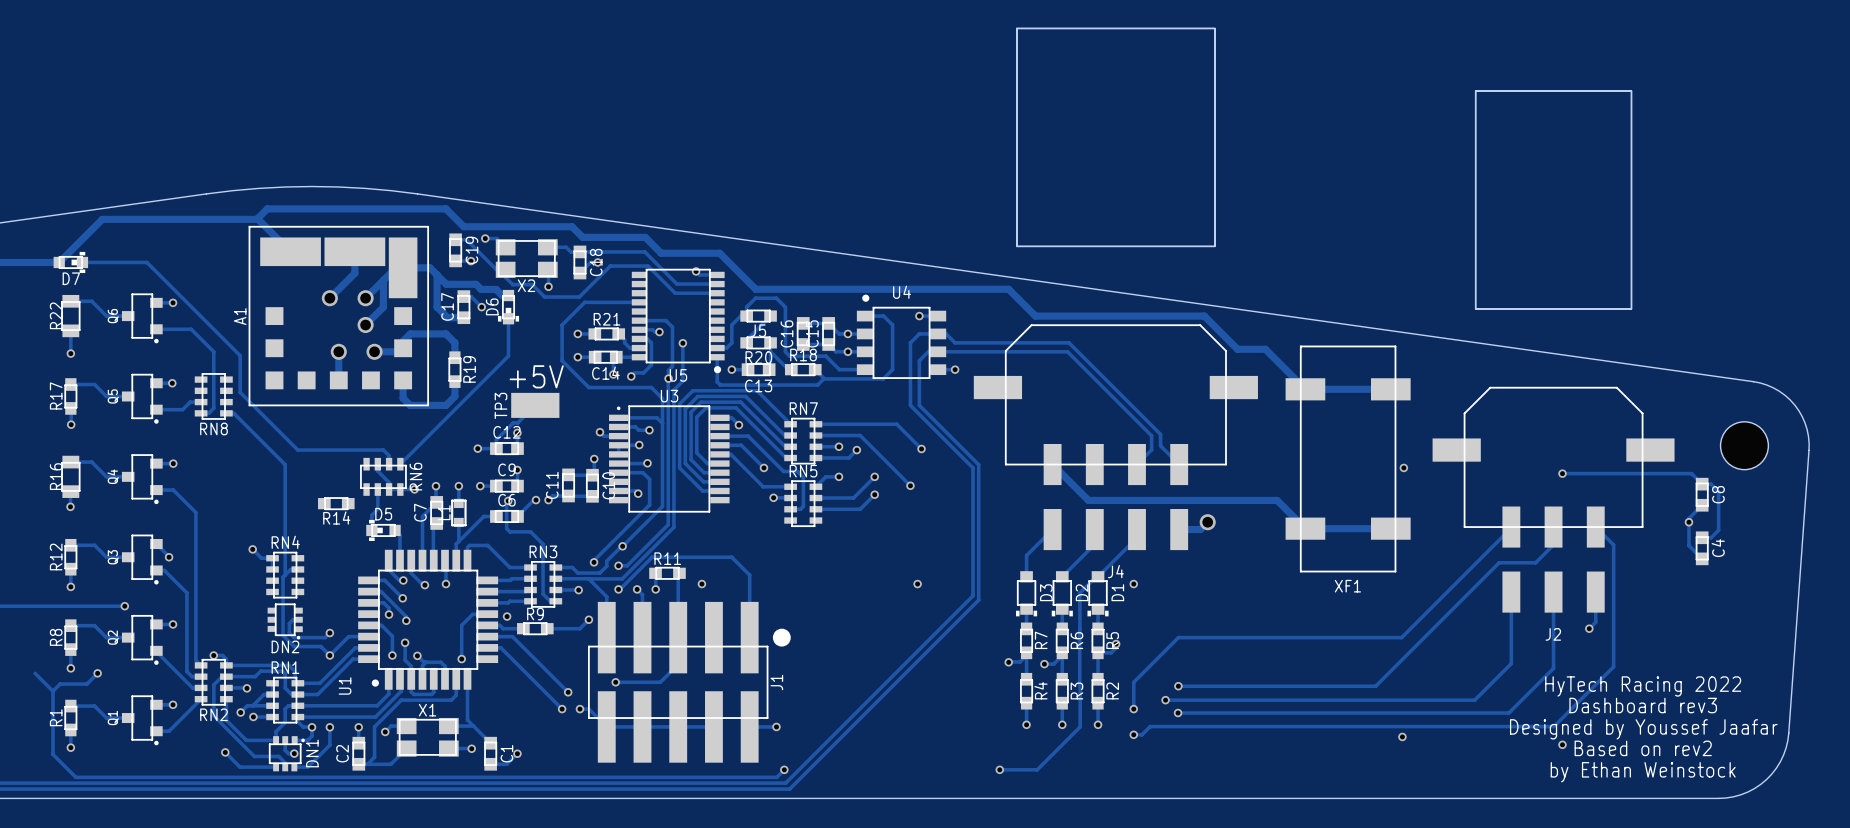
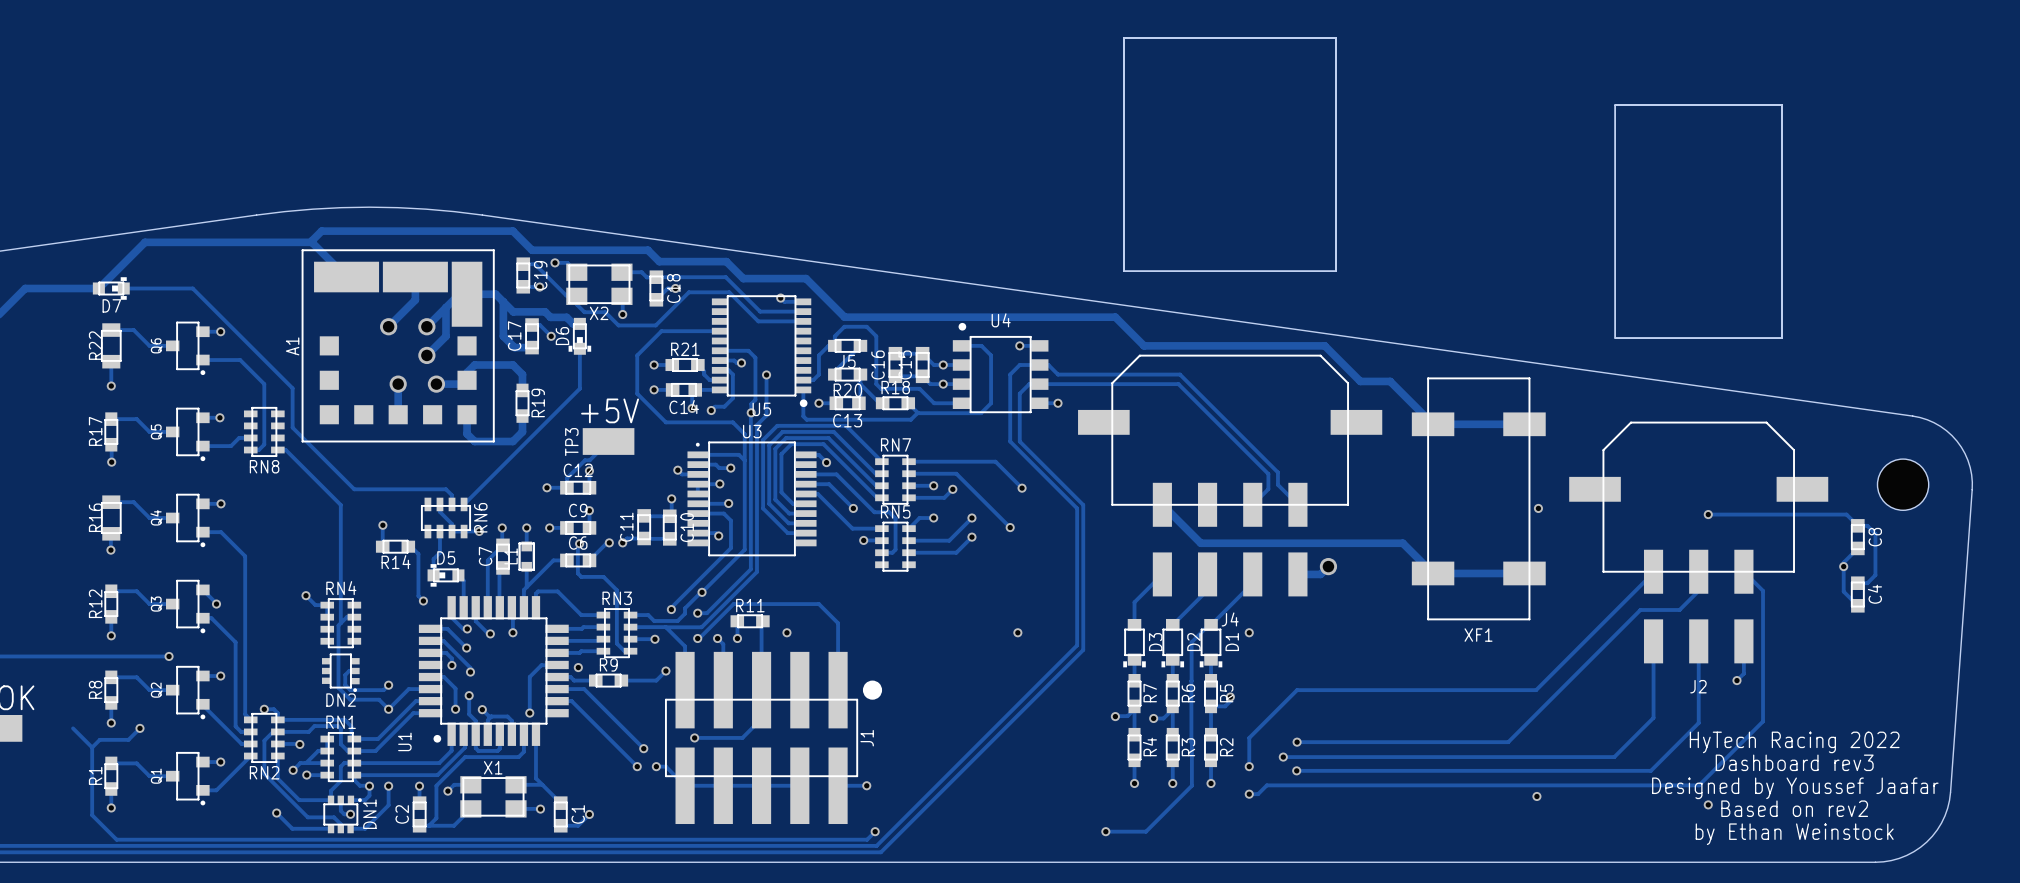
track: none -> (382, 525) (382, 546)
via: none -> (382, 525)
track: none -> (408, 546) (411, 546) (418, 554) (418, 596) (423, 601)
via: none -> (423, 601)

